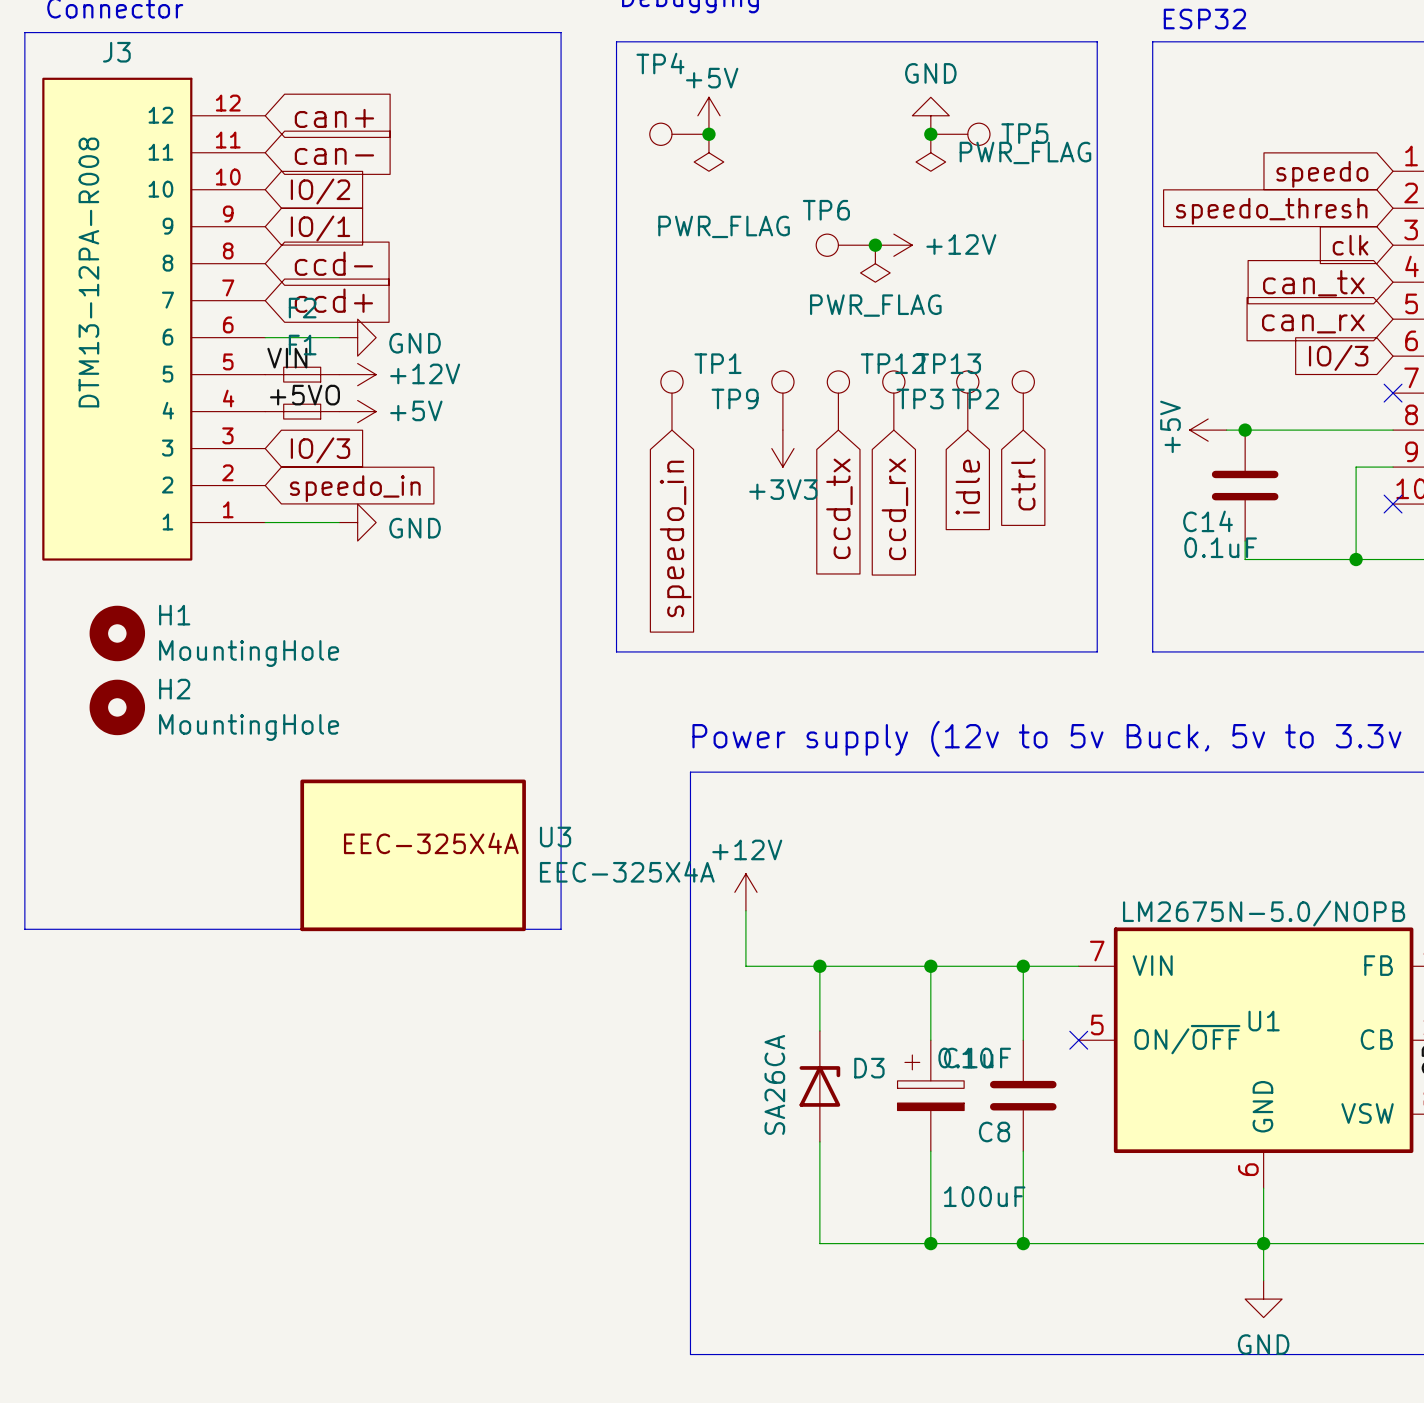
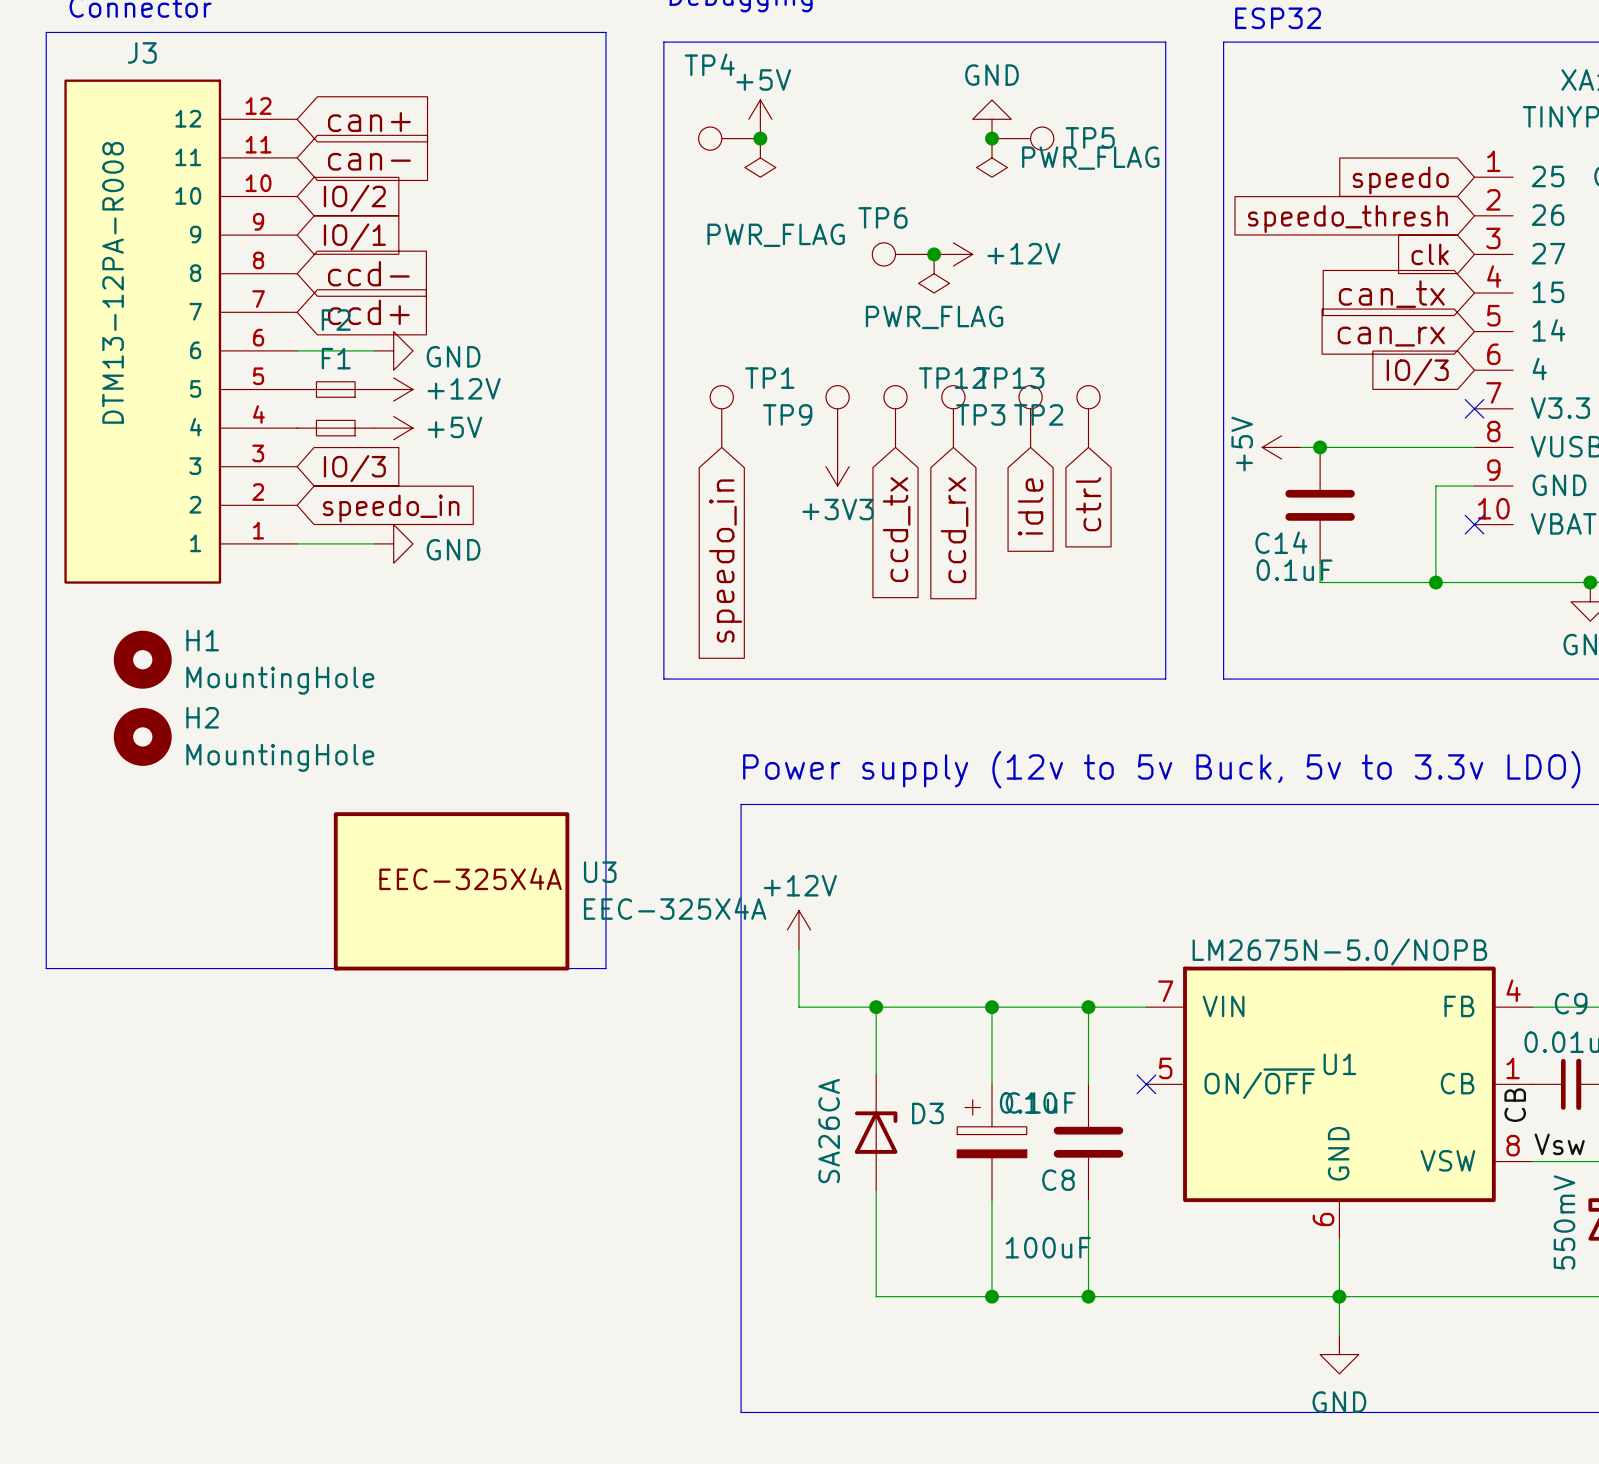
label: VIN (287, 358) -> none
label: +5VO (304, 395) -> none

